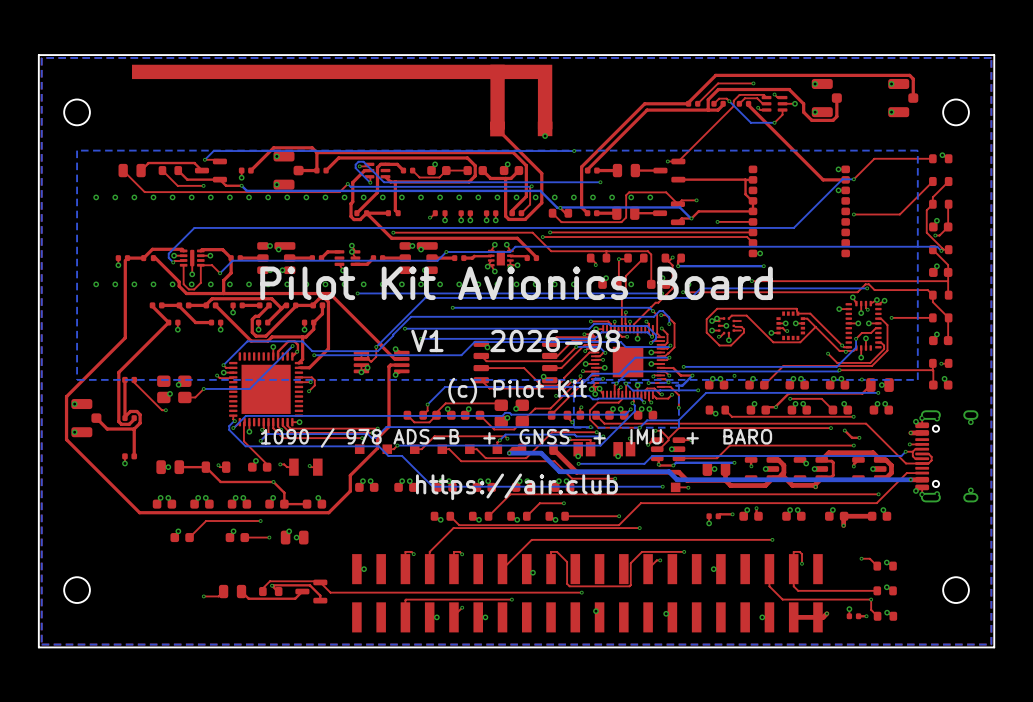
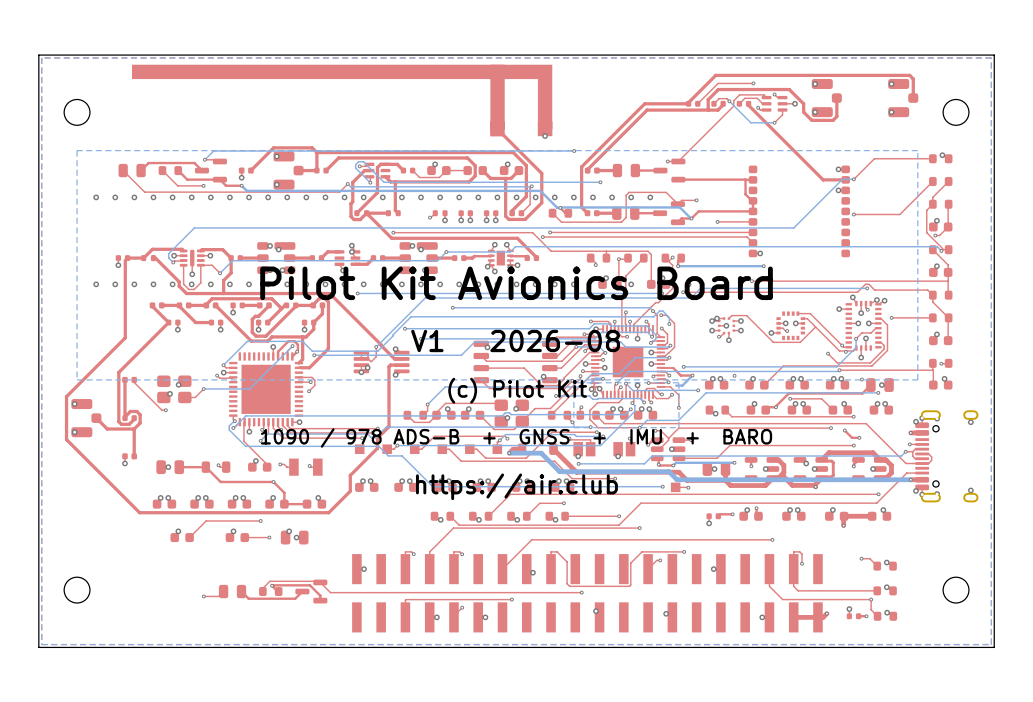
top track: (796, 311) (796, 308) (717, 308) (706, 319) (706, 332) (719, 345) (731, 345) (743, 332) (741, 326) (735, 326) -> none
via: none -> (740, 321)
via: none -> (740, 330)

